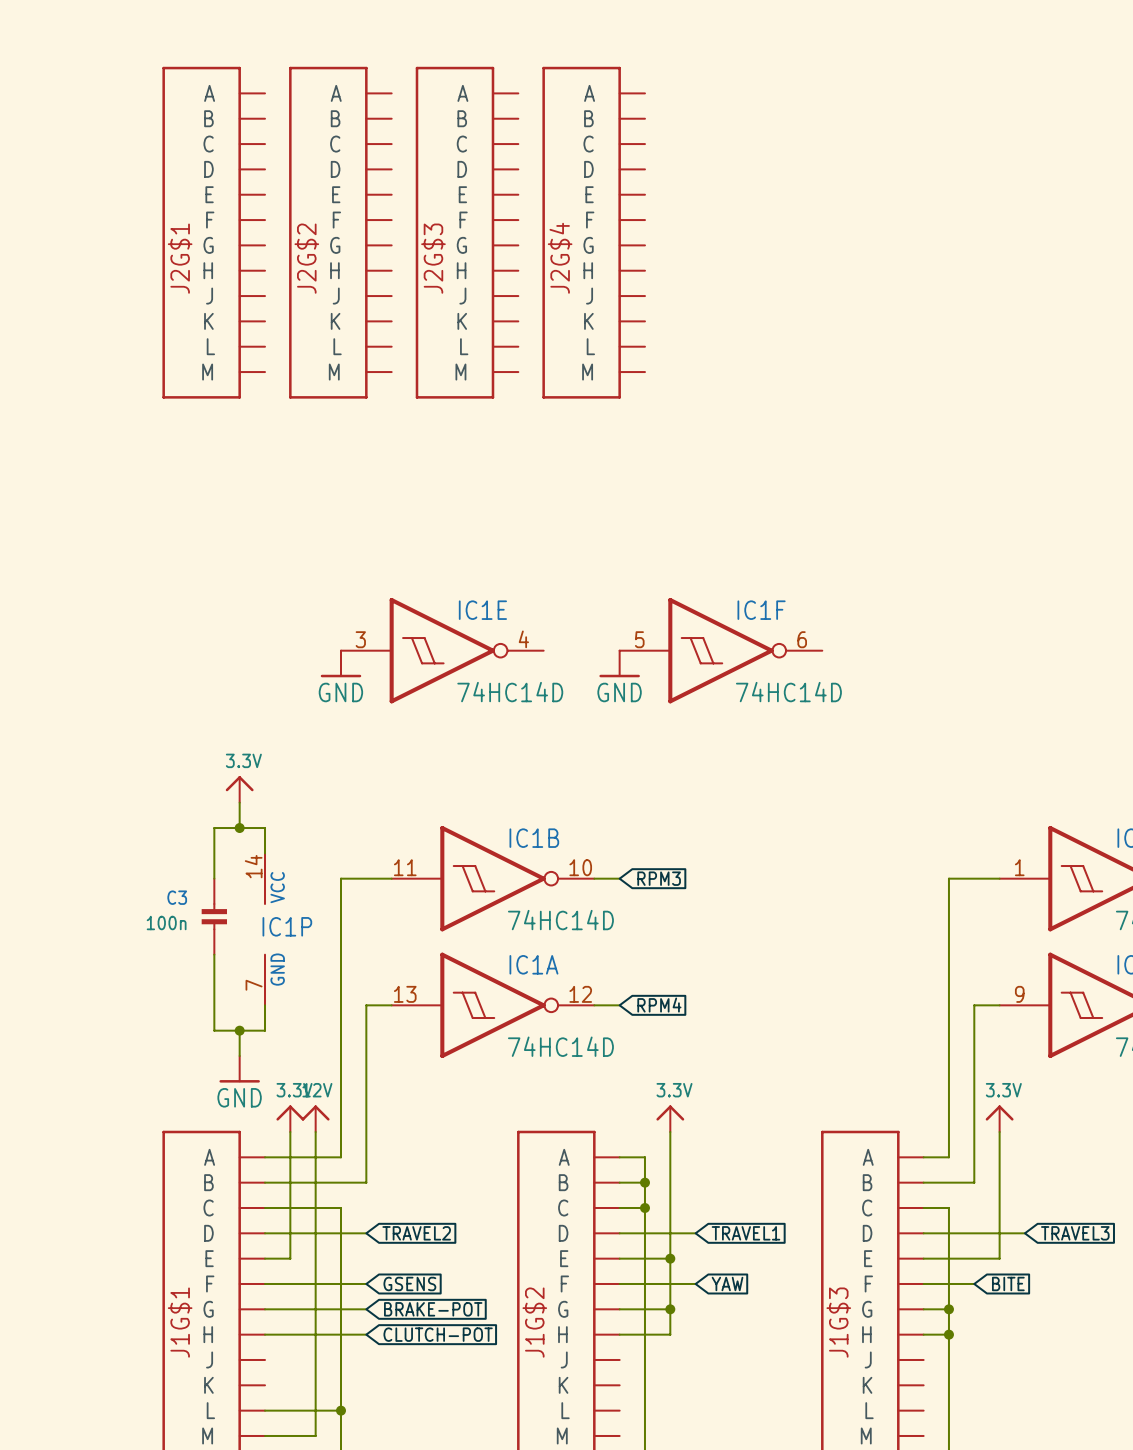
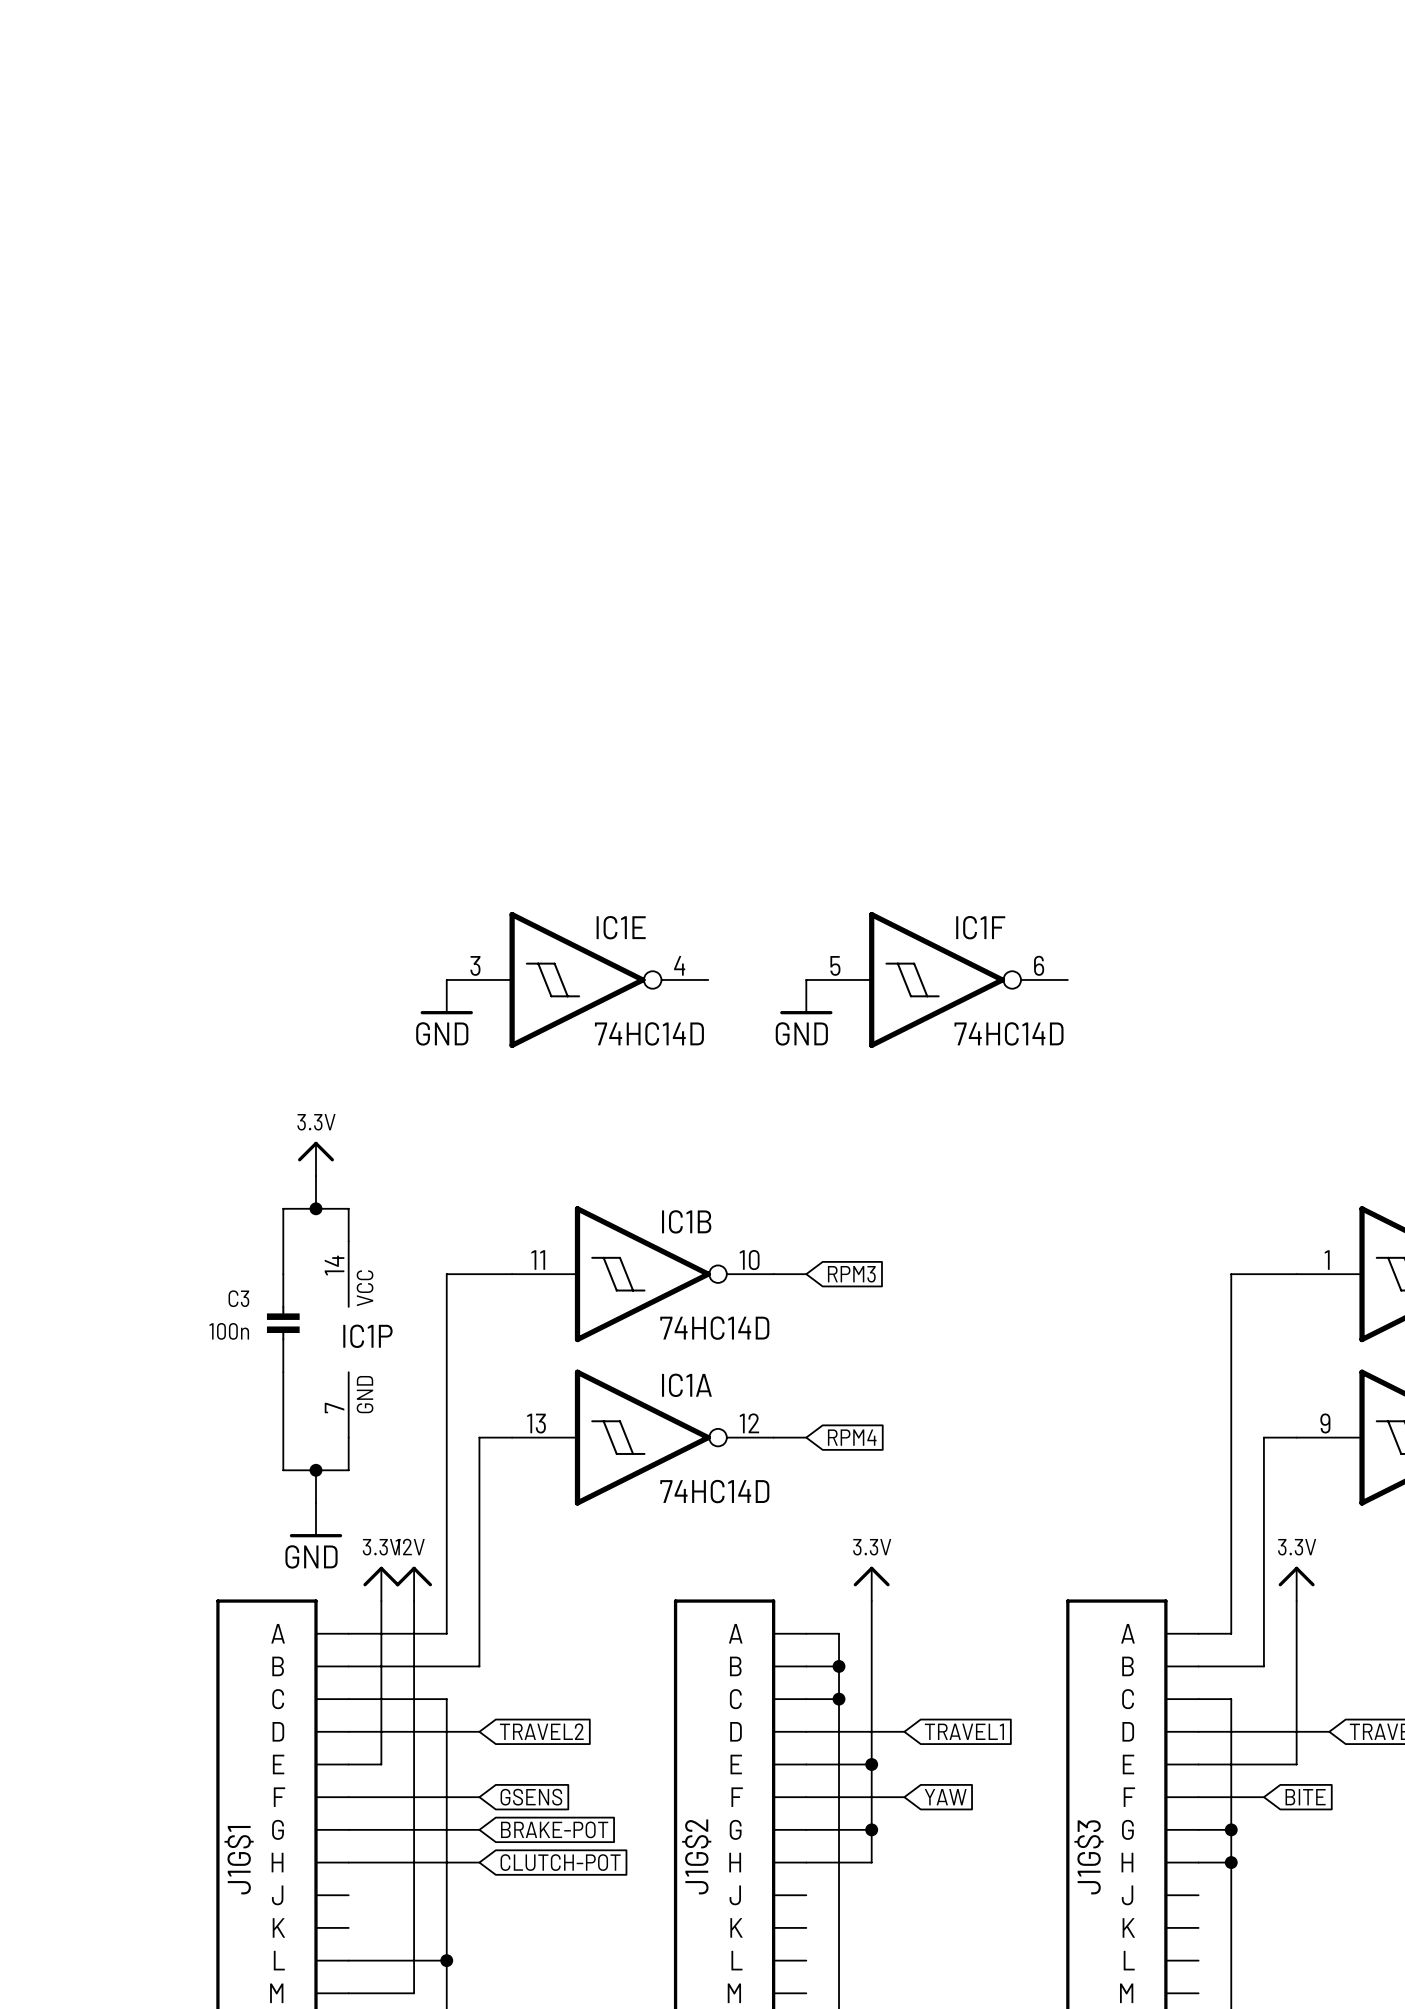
J2G$1: (213, 232) -> none
J2G$2: (340, 232) -> none
J2G$3: (467, 232) -> none
J2G$4: (593, 232) -> none

